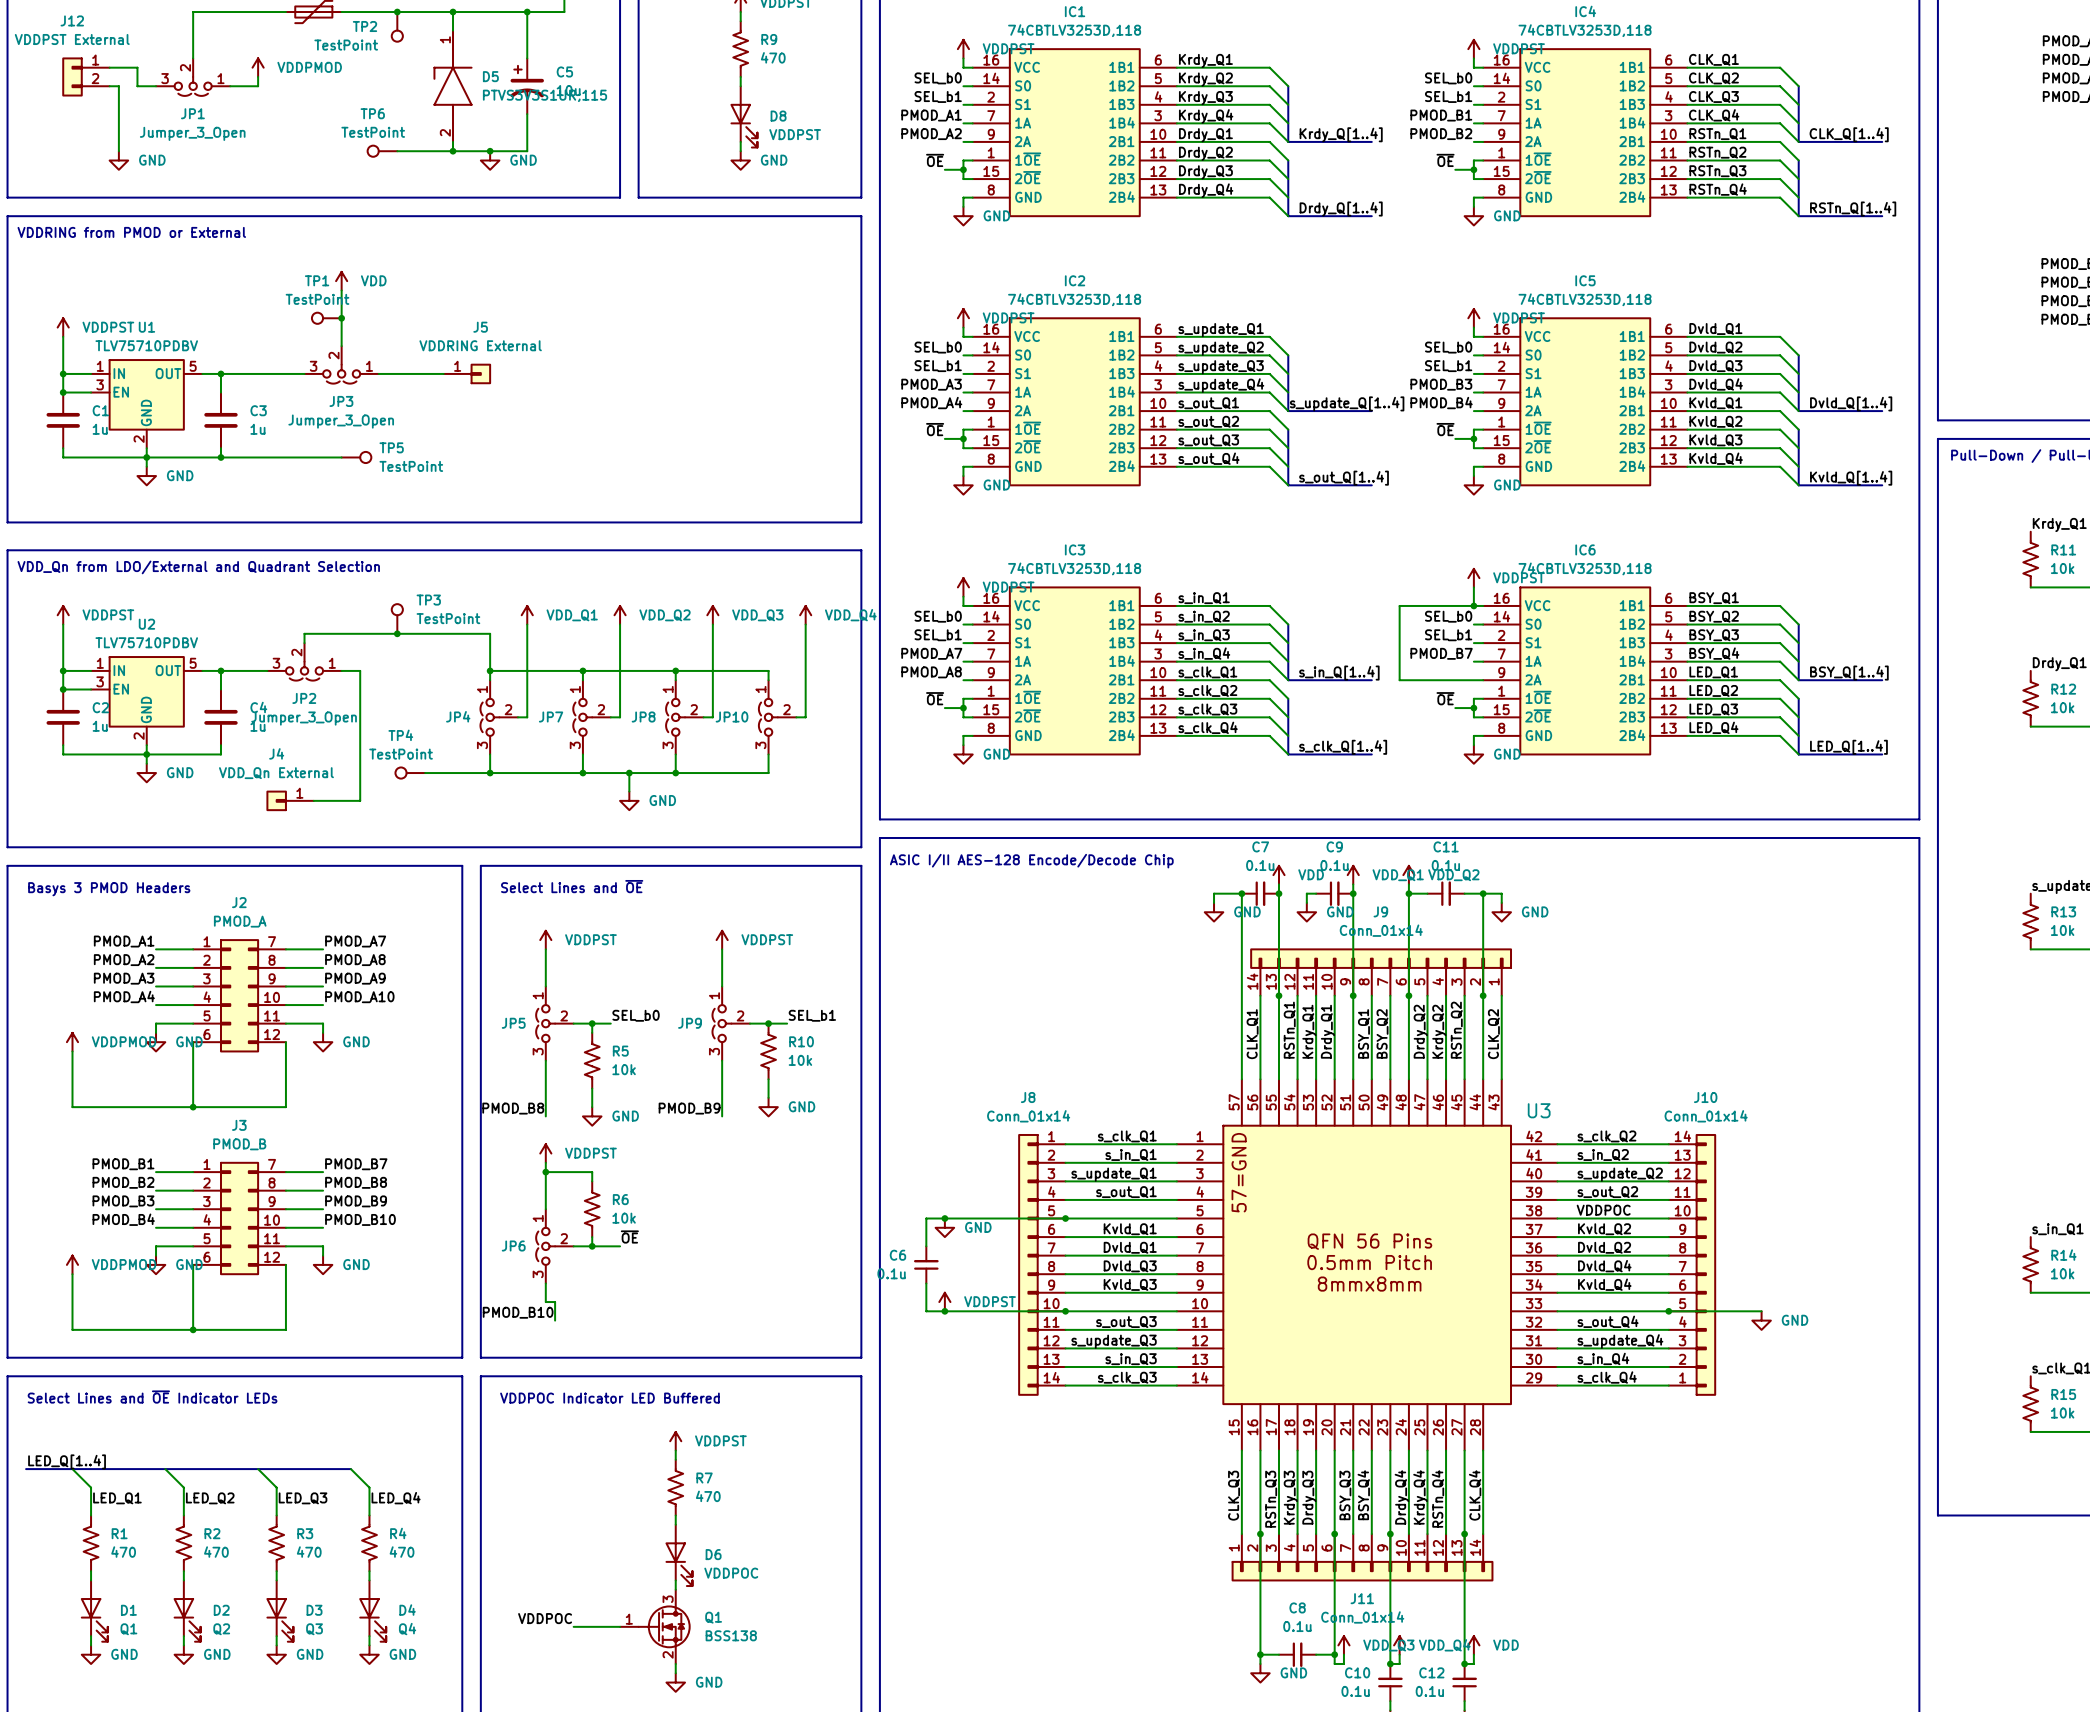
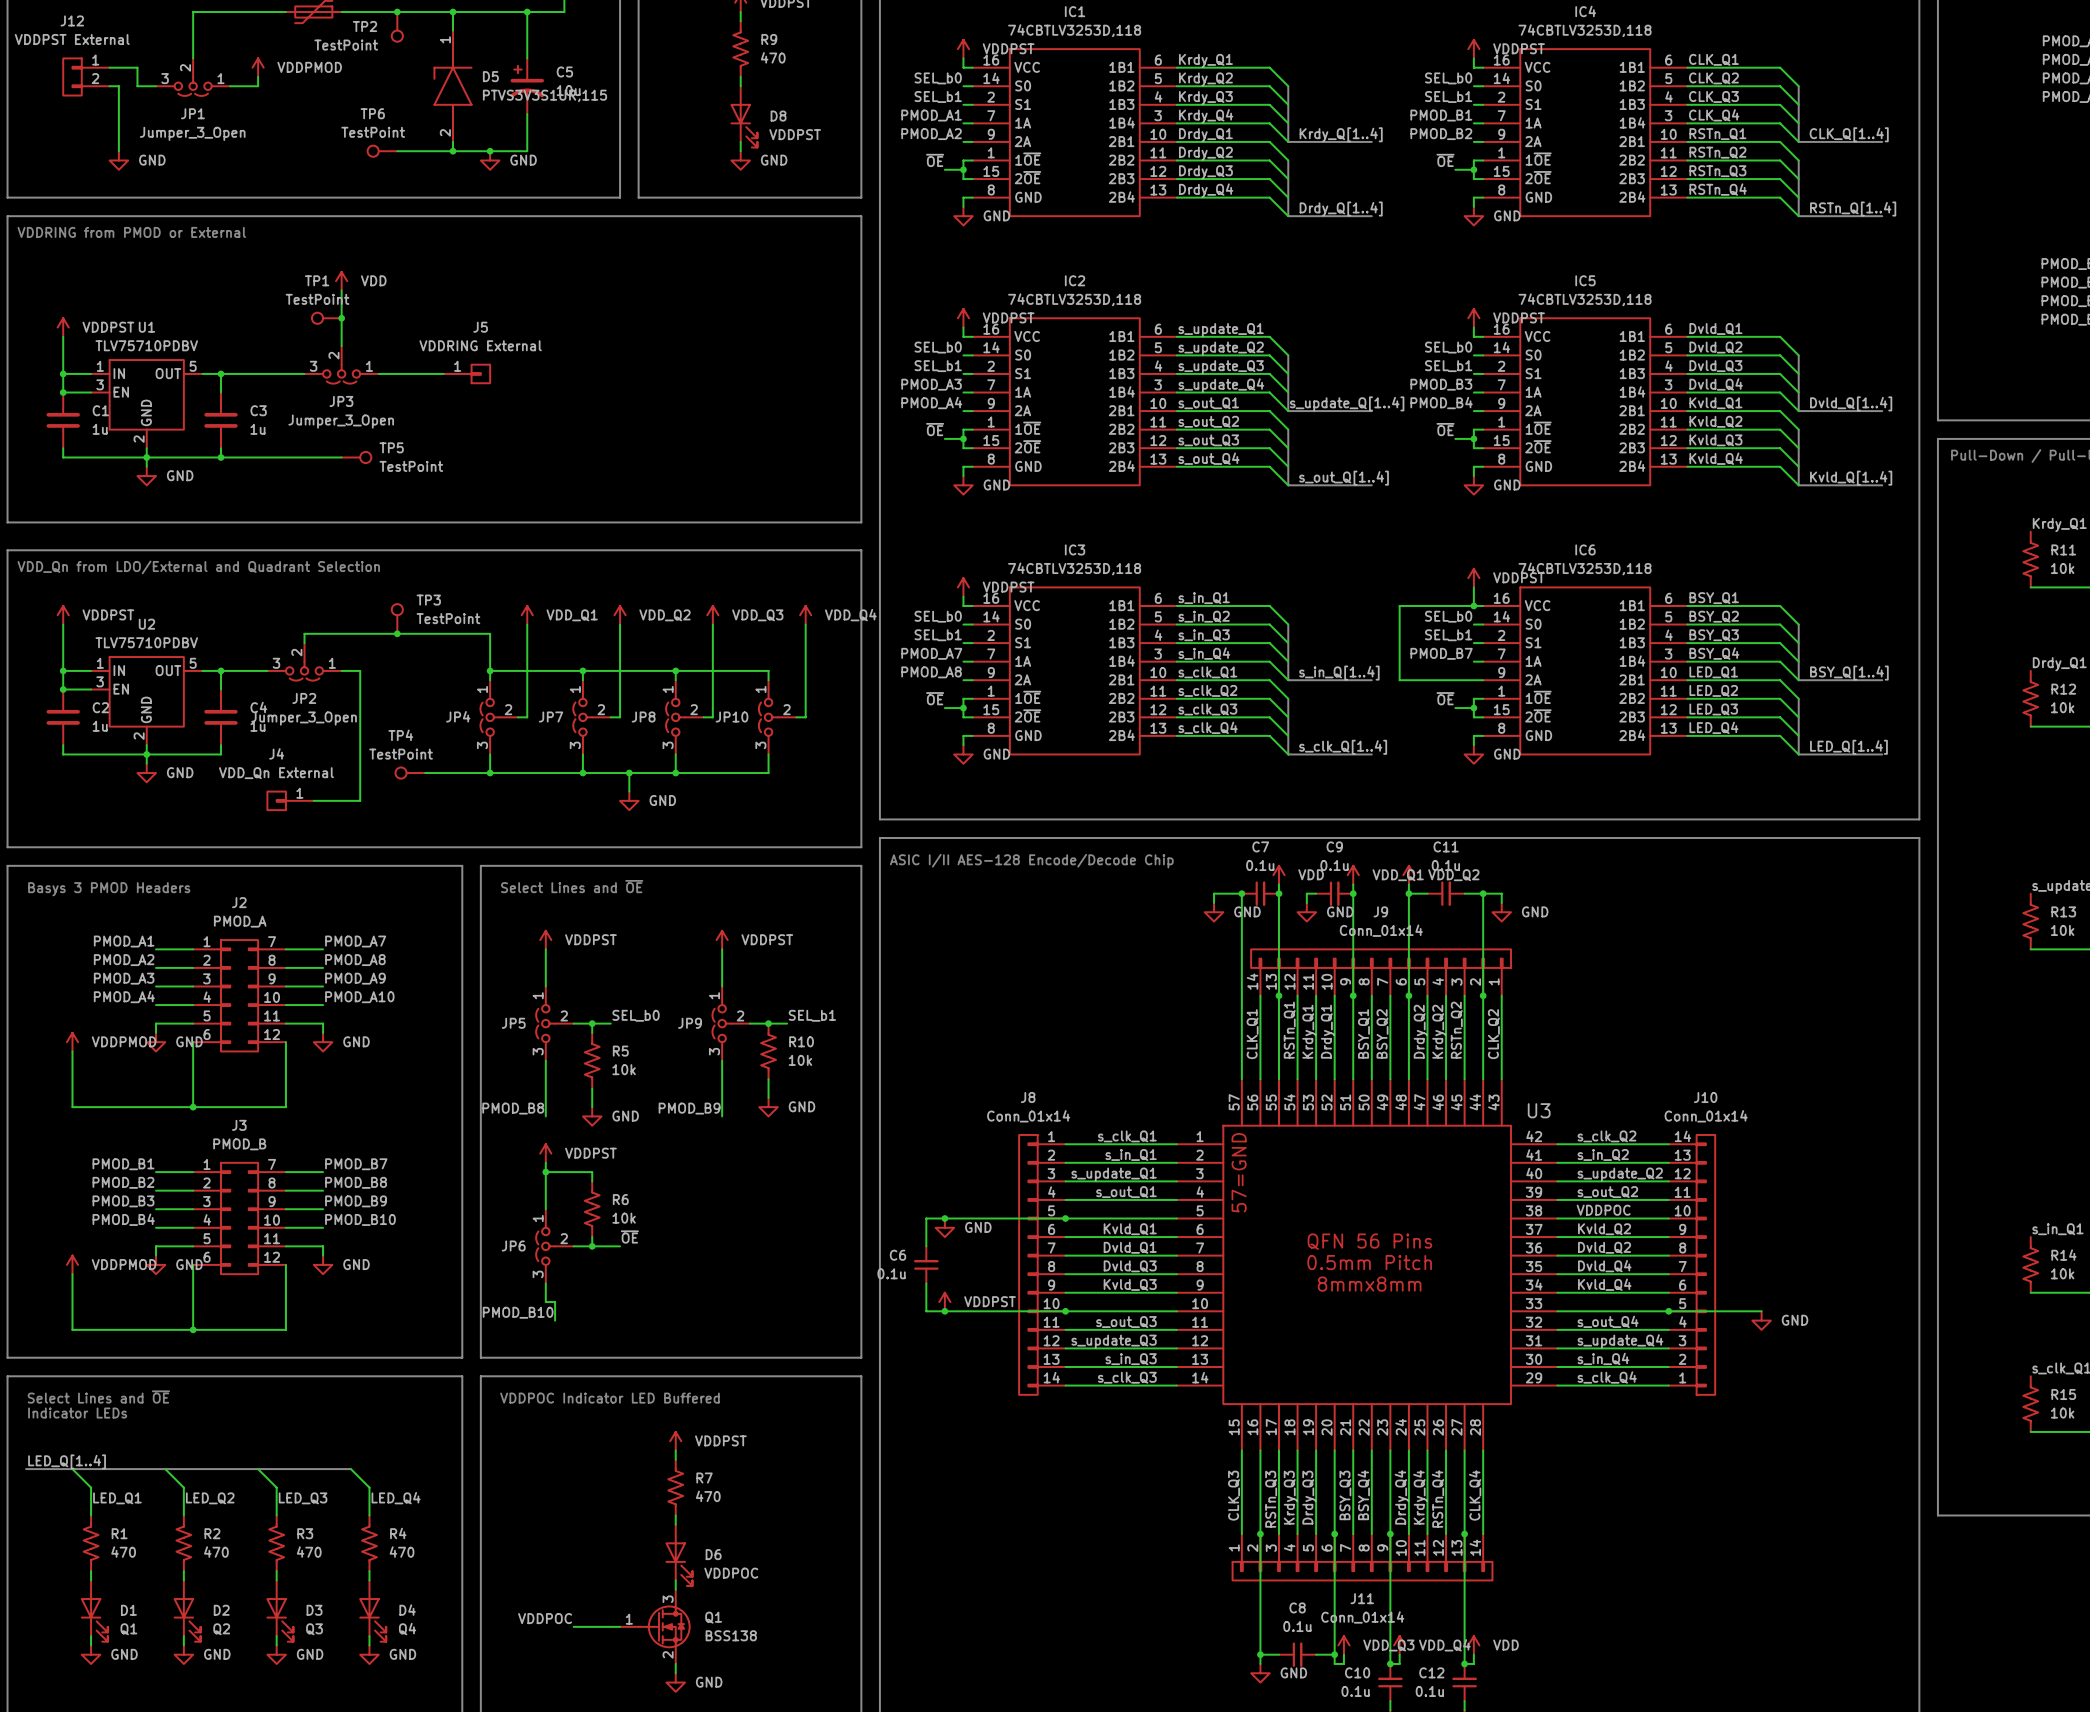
text: Select Lines and ~{OE} Indicator LEDs (152, 1397) -> Select Lines and ~{OE} (98, 1397)
text: none -> Indicator LEDs (77, 1413)

